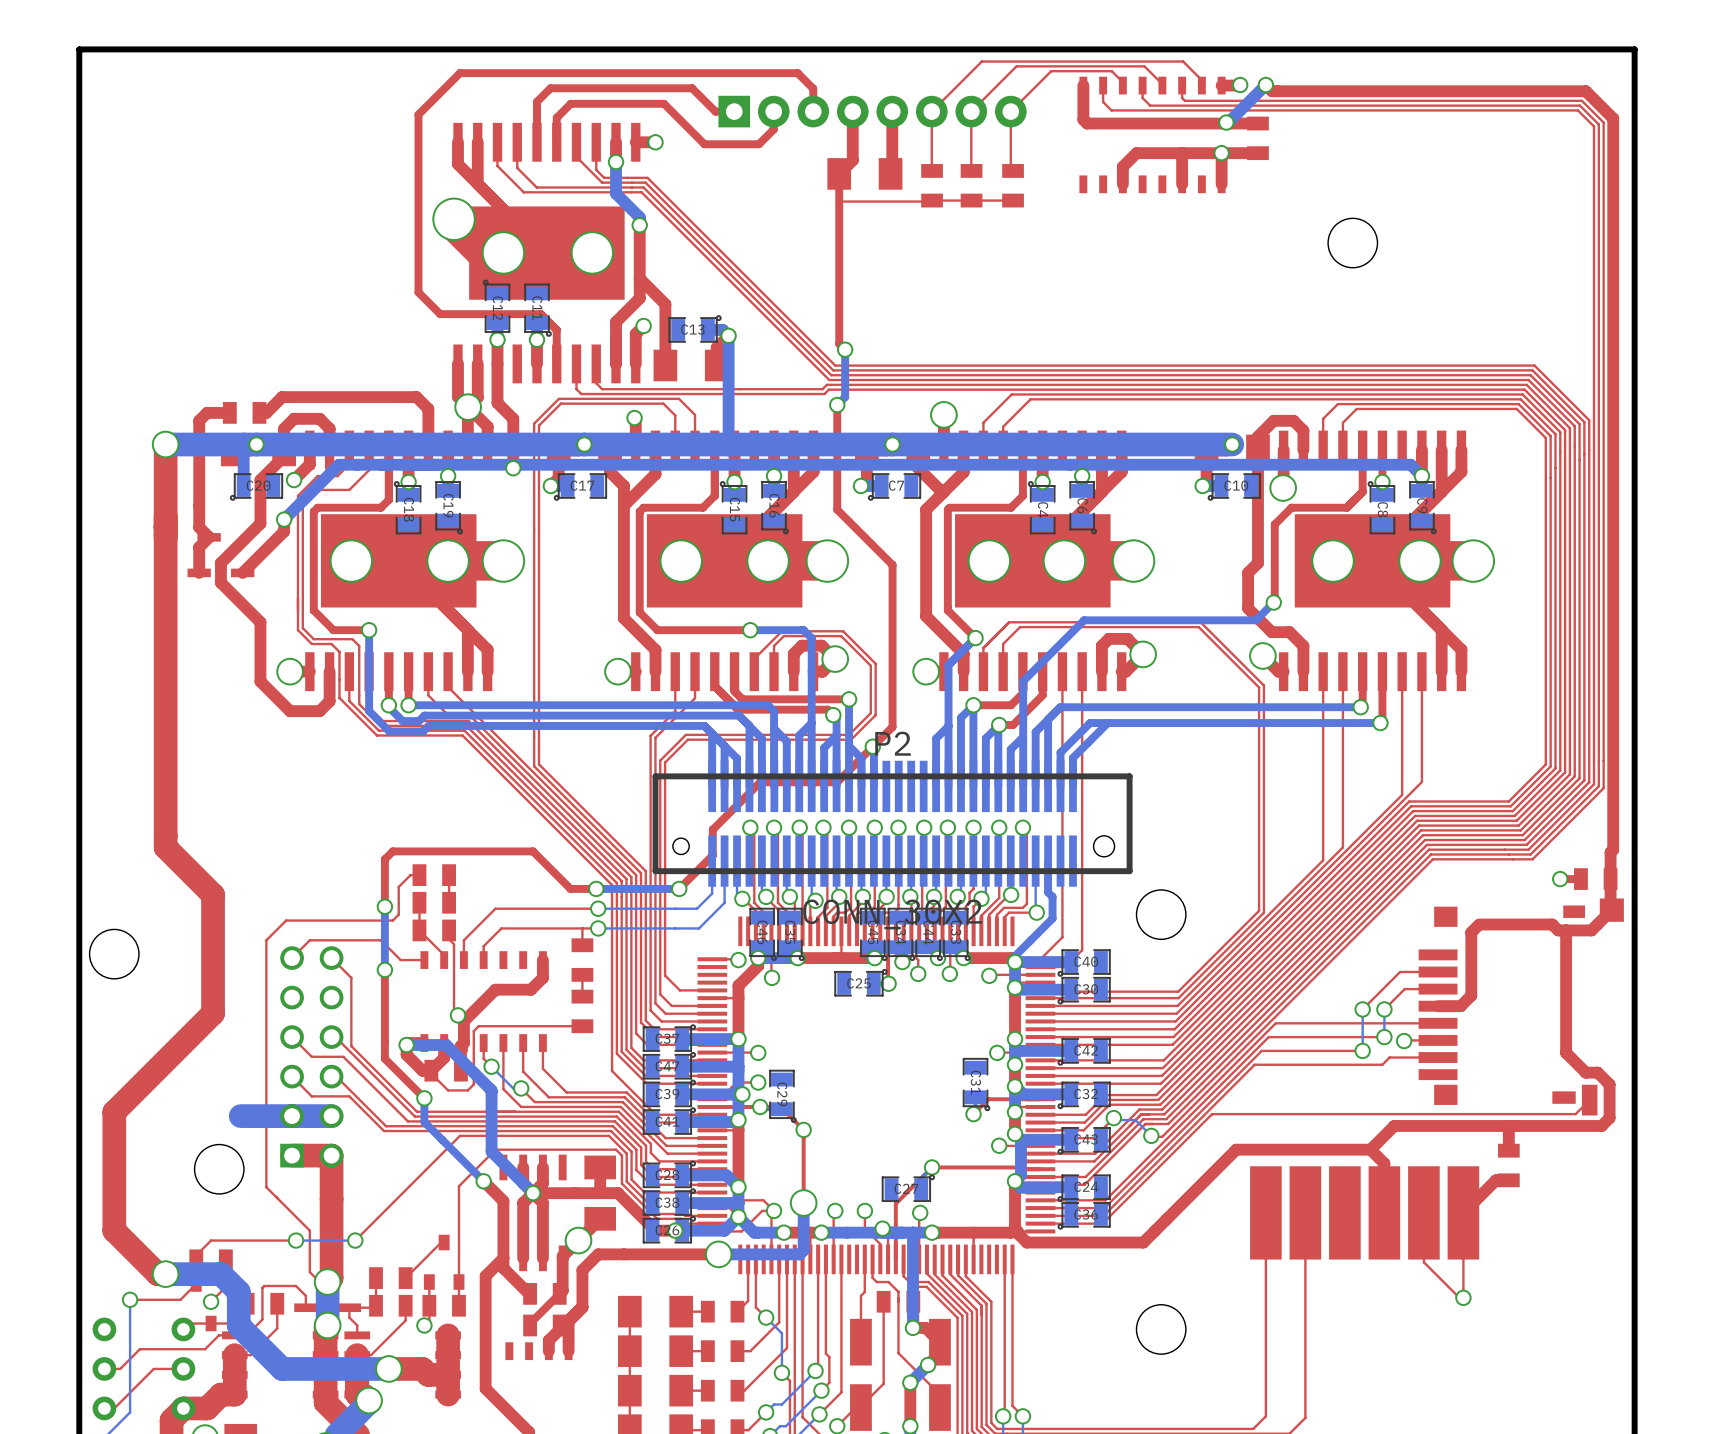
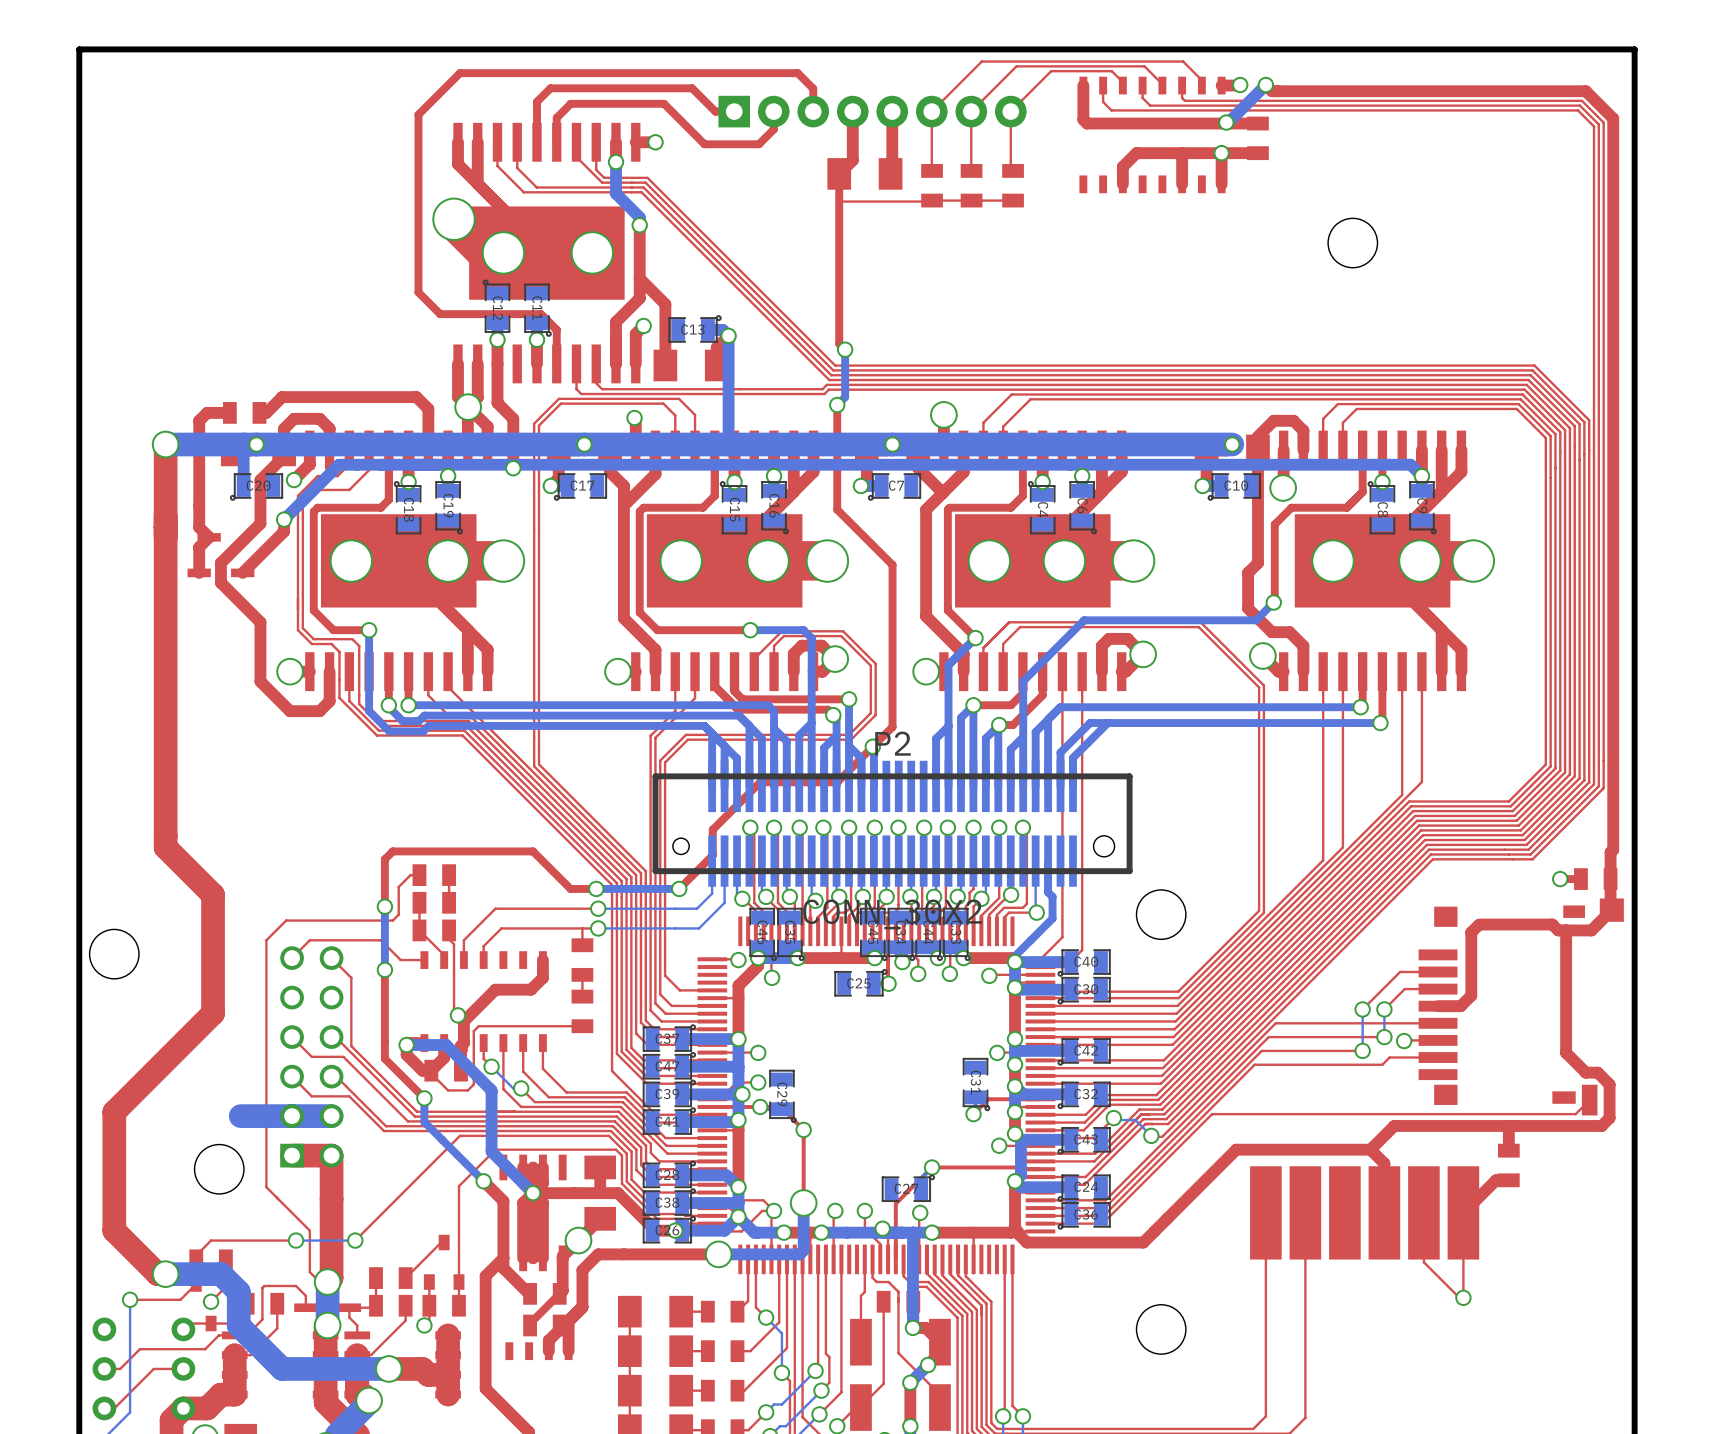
top track: none -> (533, 1167) (533, 1258)

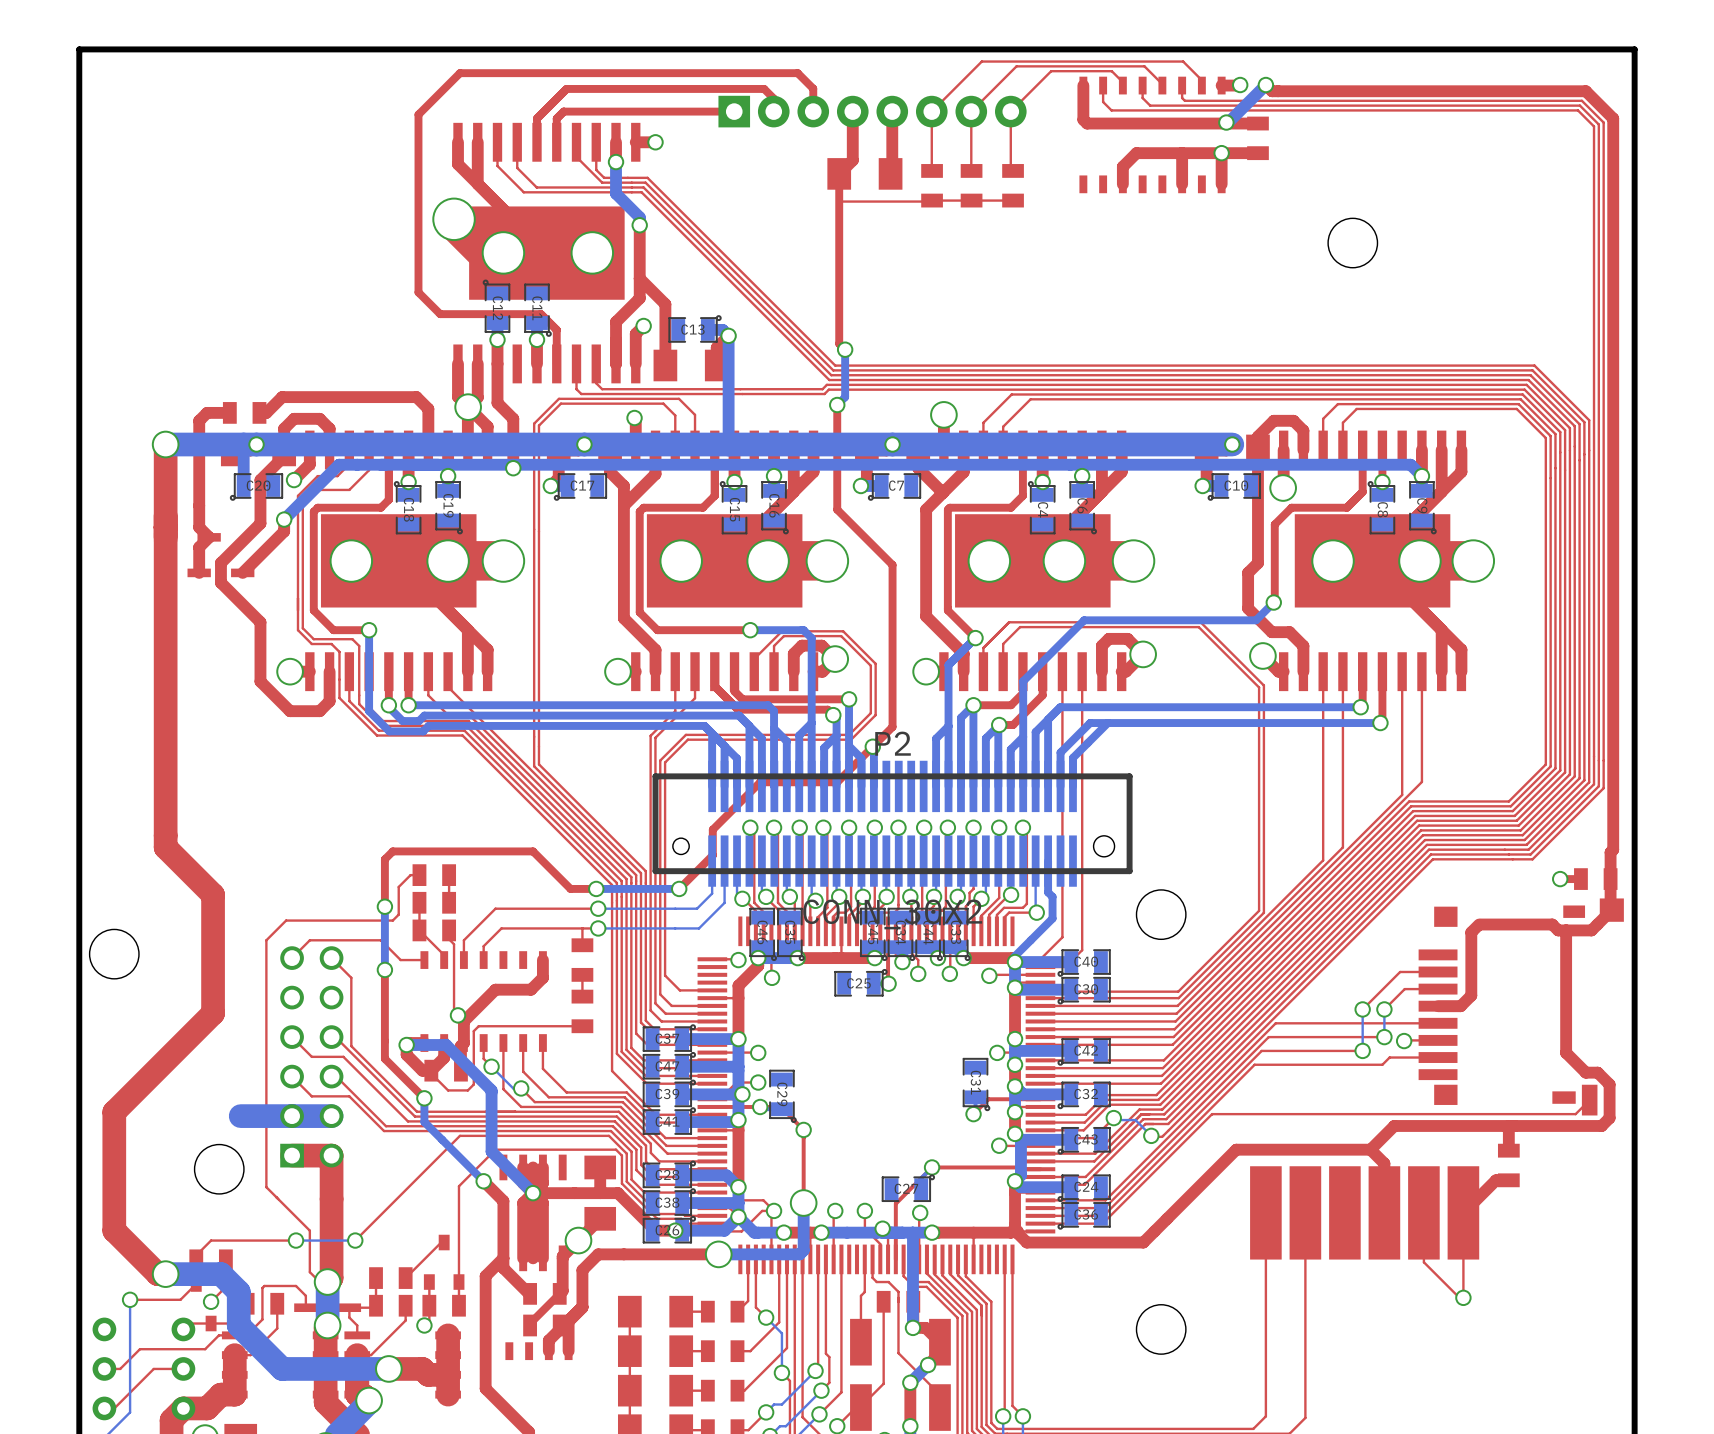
top track: (715, 111) (692, 88) (550, 88) (537, 101) (537, 118) -> (715, 111) (563, 111) (556, 118)
top track: (773, 111) (773, 129) (758, 144) (704, 144) (664, 103) (570, 103) (556, 118) -> (773, 111) (773, 98) (764, 88) (566, 88) (537, 118)

